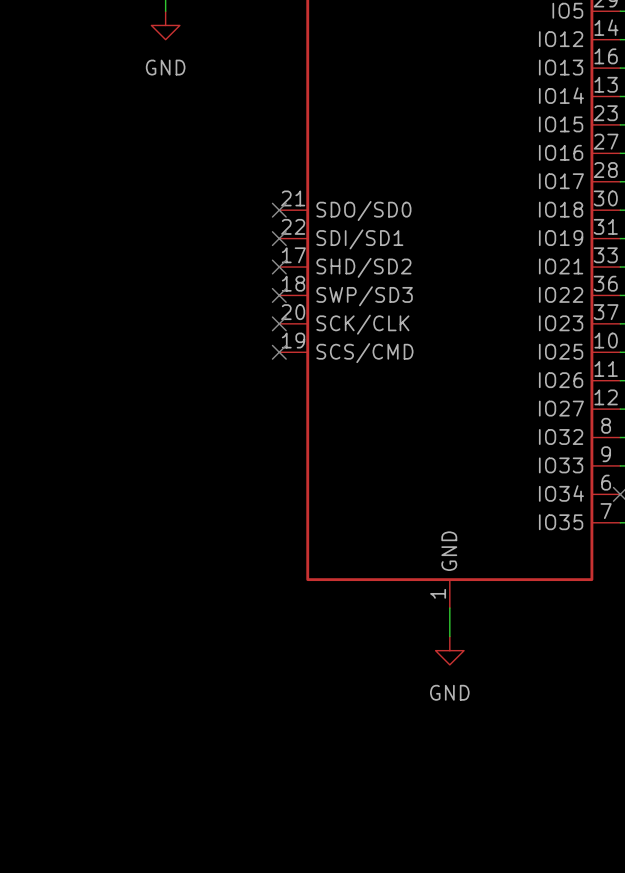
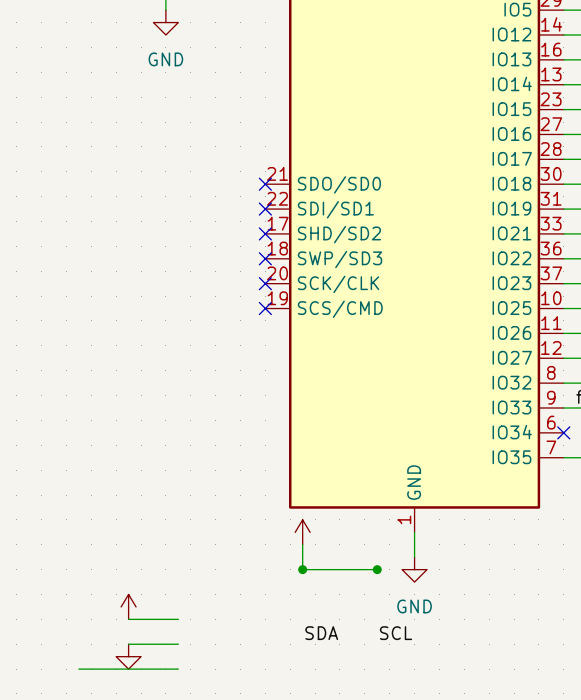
power symbol: none -> (302, 532)
wire: none -> (302, 544) (302, 569) (377, 569)
junction: none -> (302, 569)
junction: none -> (377, 569)
power symbol: none -> (128, 606)
wire: none -> (128, 619) (178, 619)
label: none -> SDA (321, 633)
label: none -> SCL (396, 633)
wire: none -> (128, 644) (178, 644)
power symbol: none -> (128, 656)
wire: none -> (78, 669) (178, 669)

